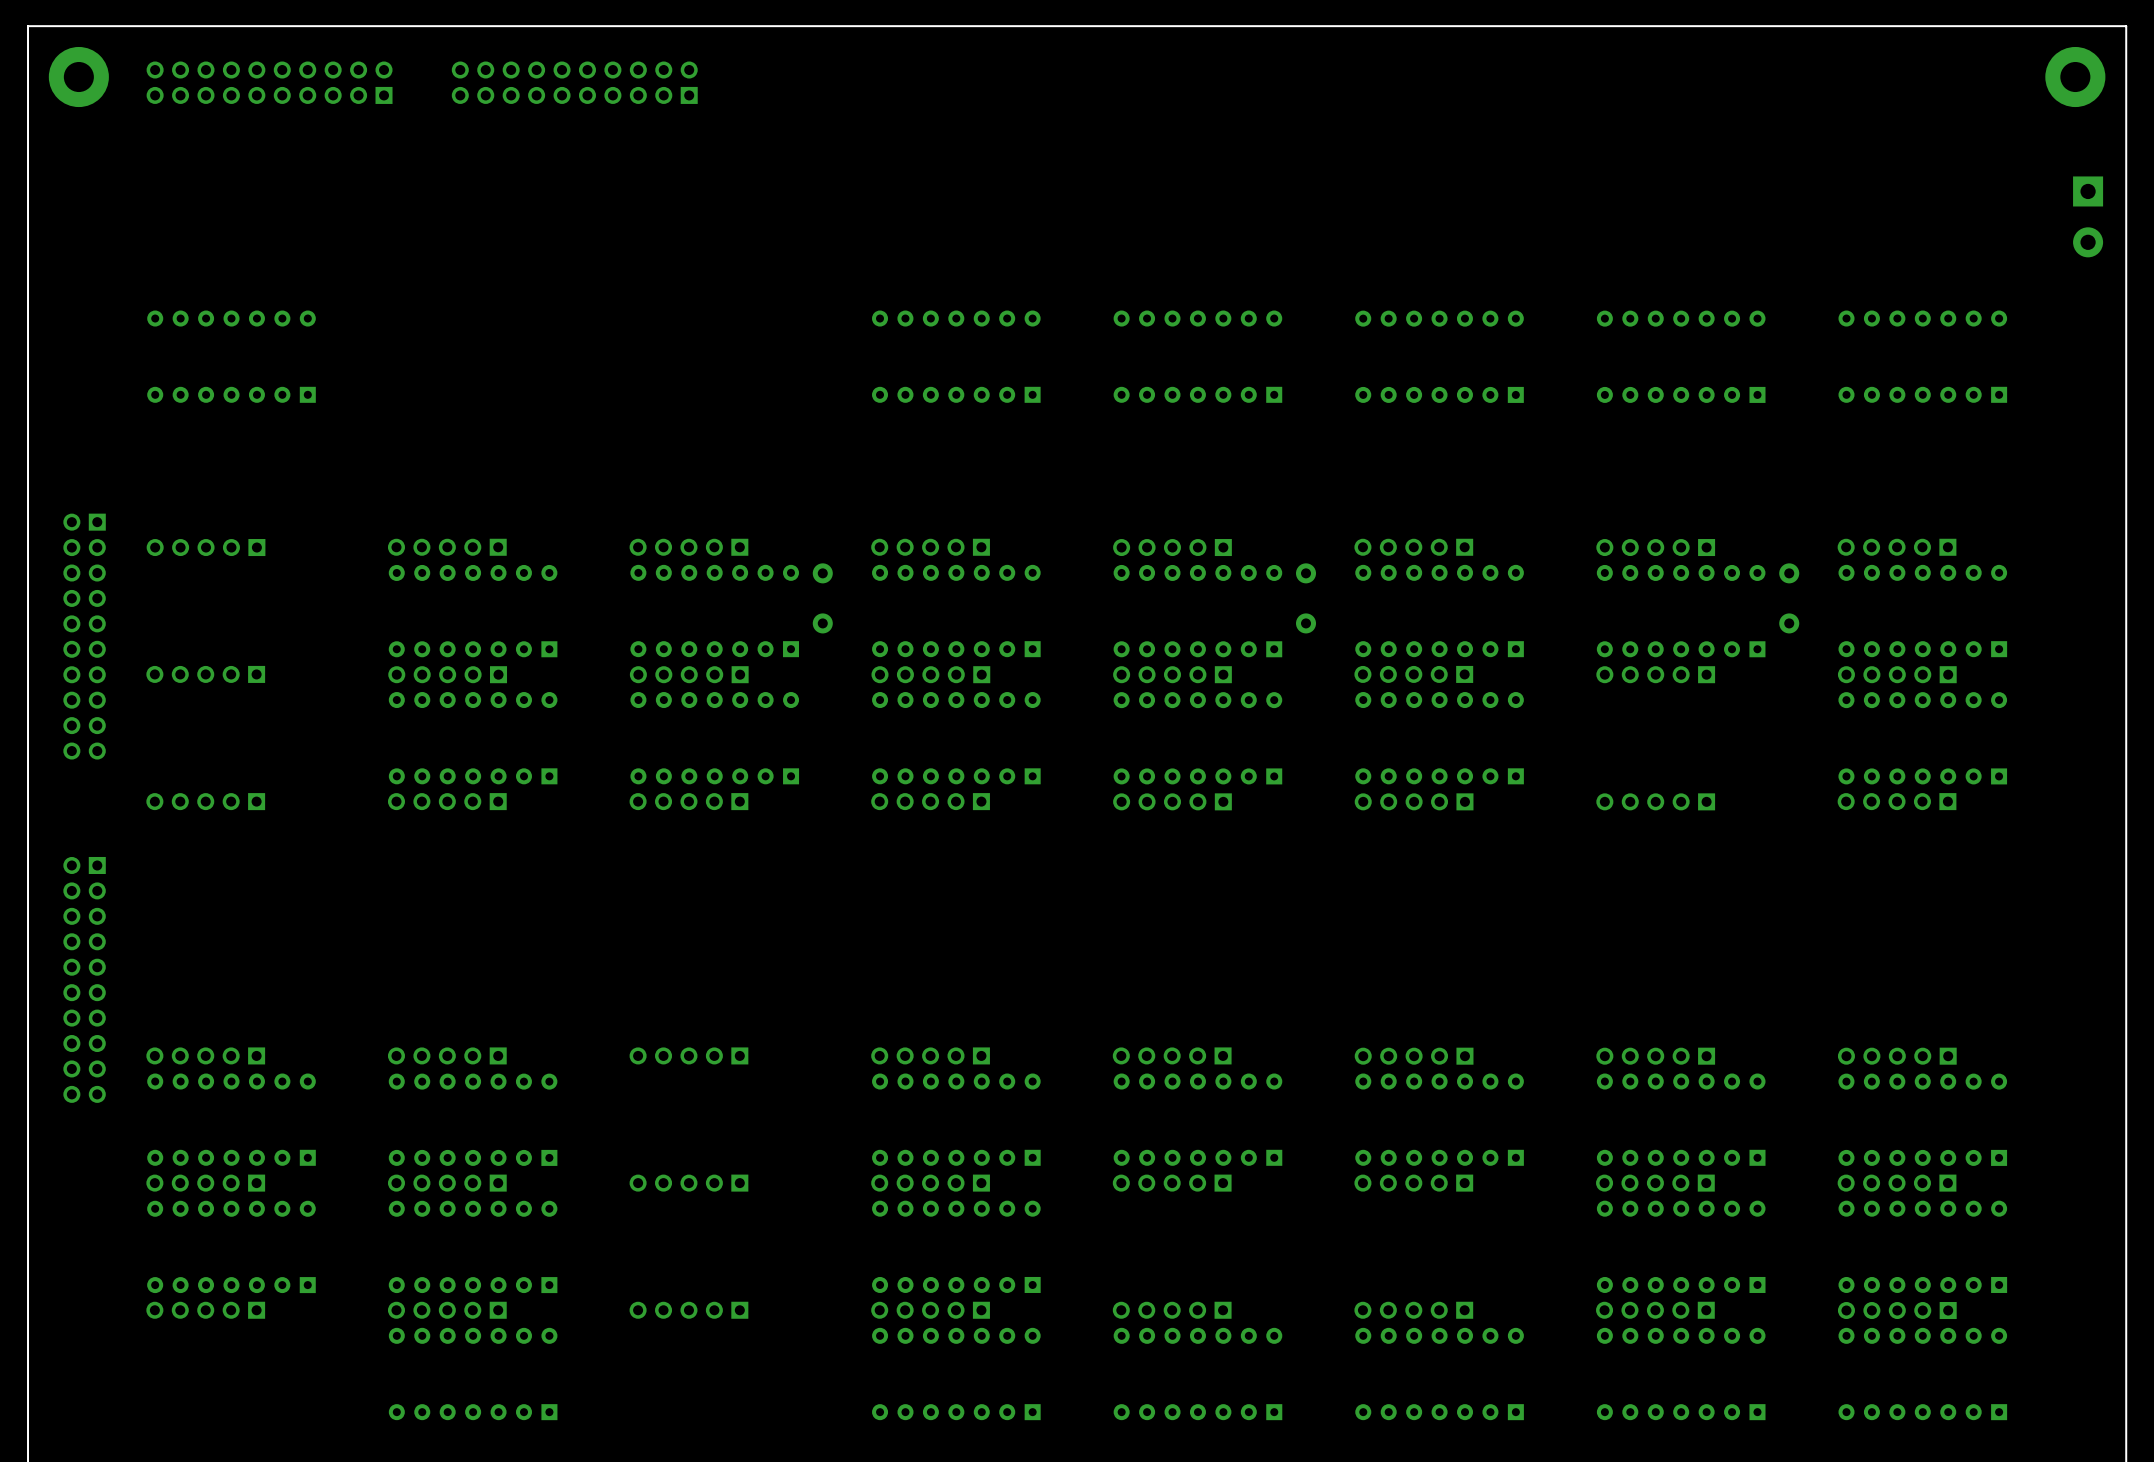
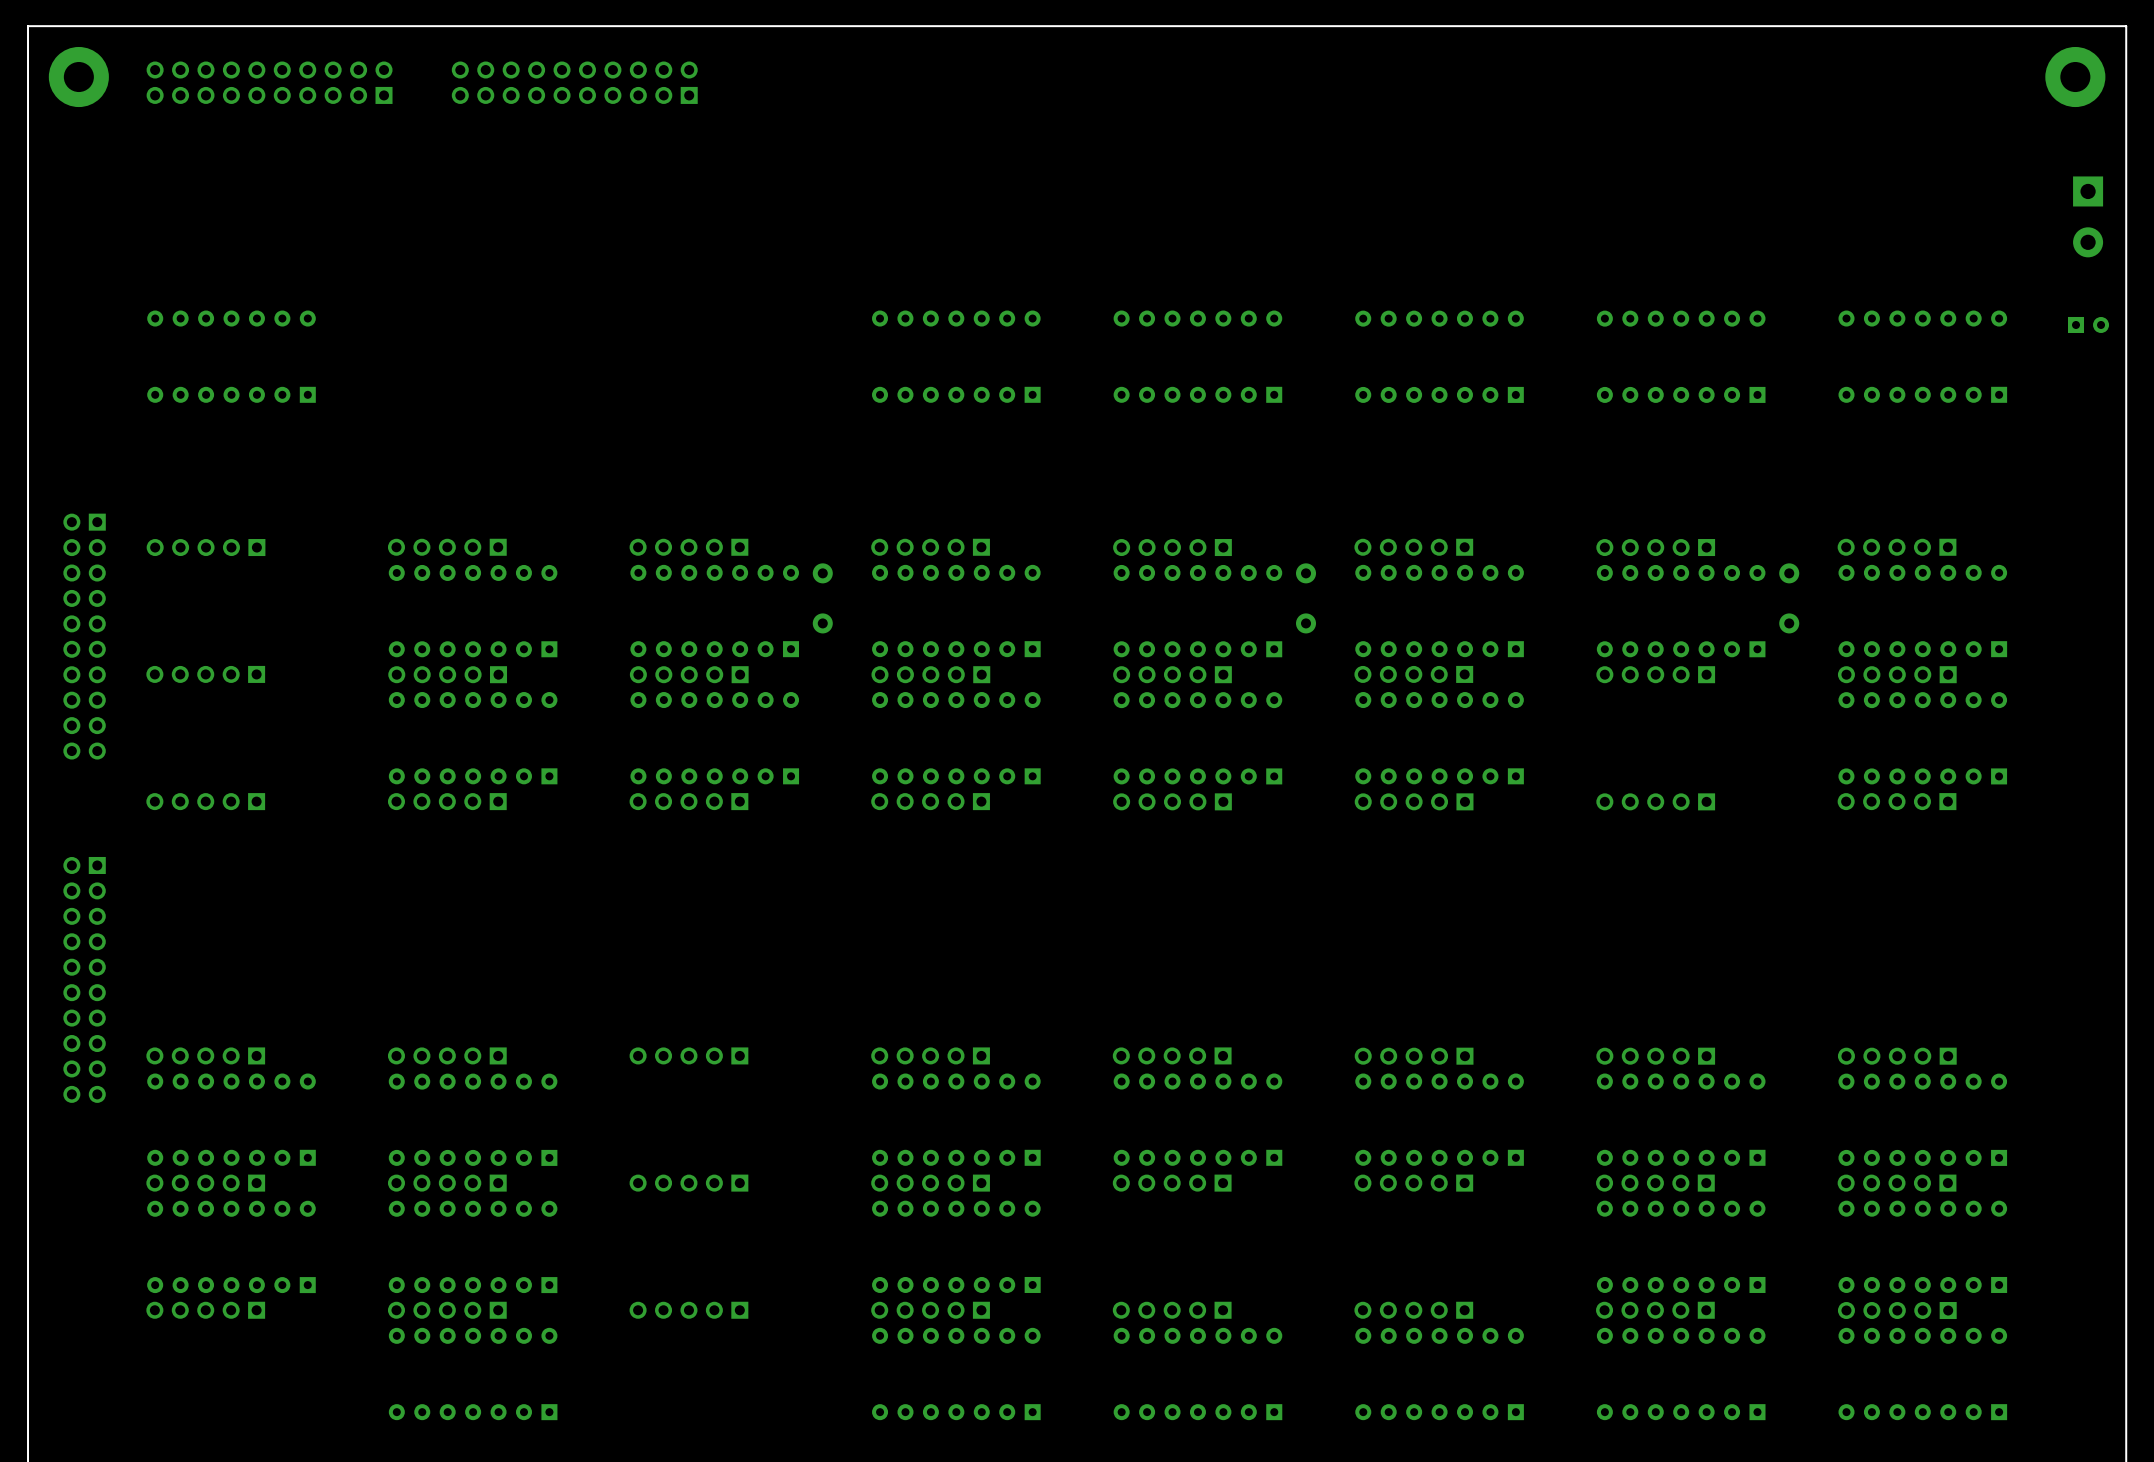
part: none -> (2088, 324)

